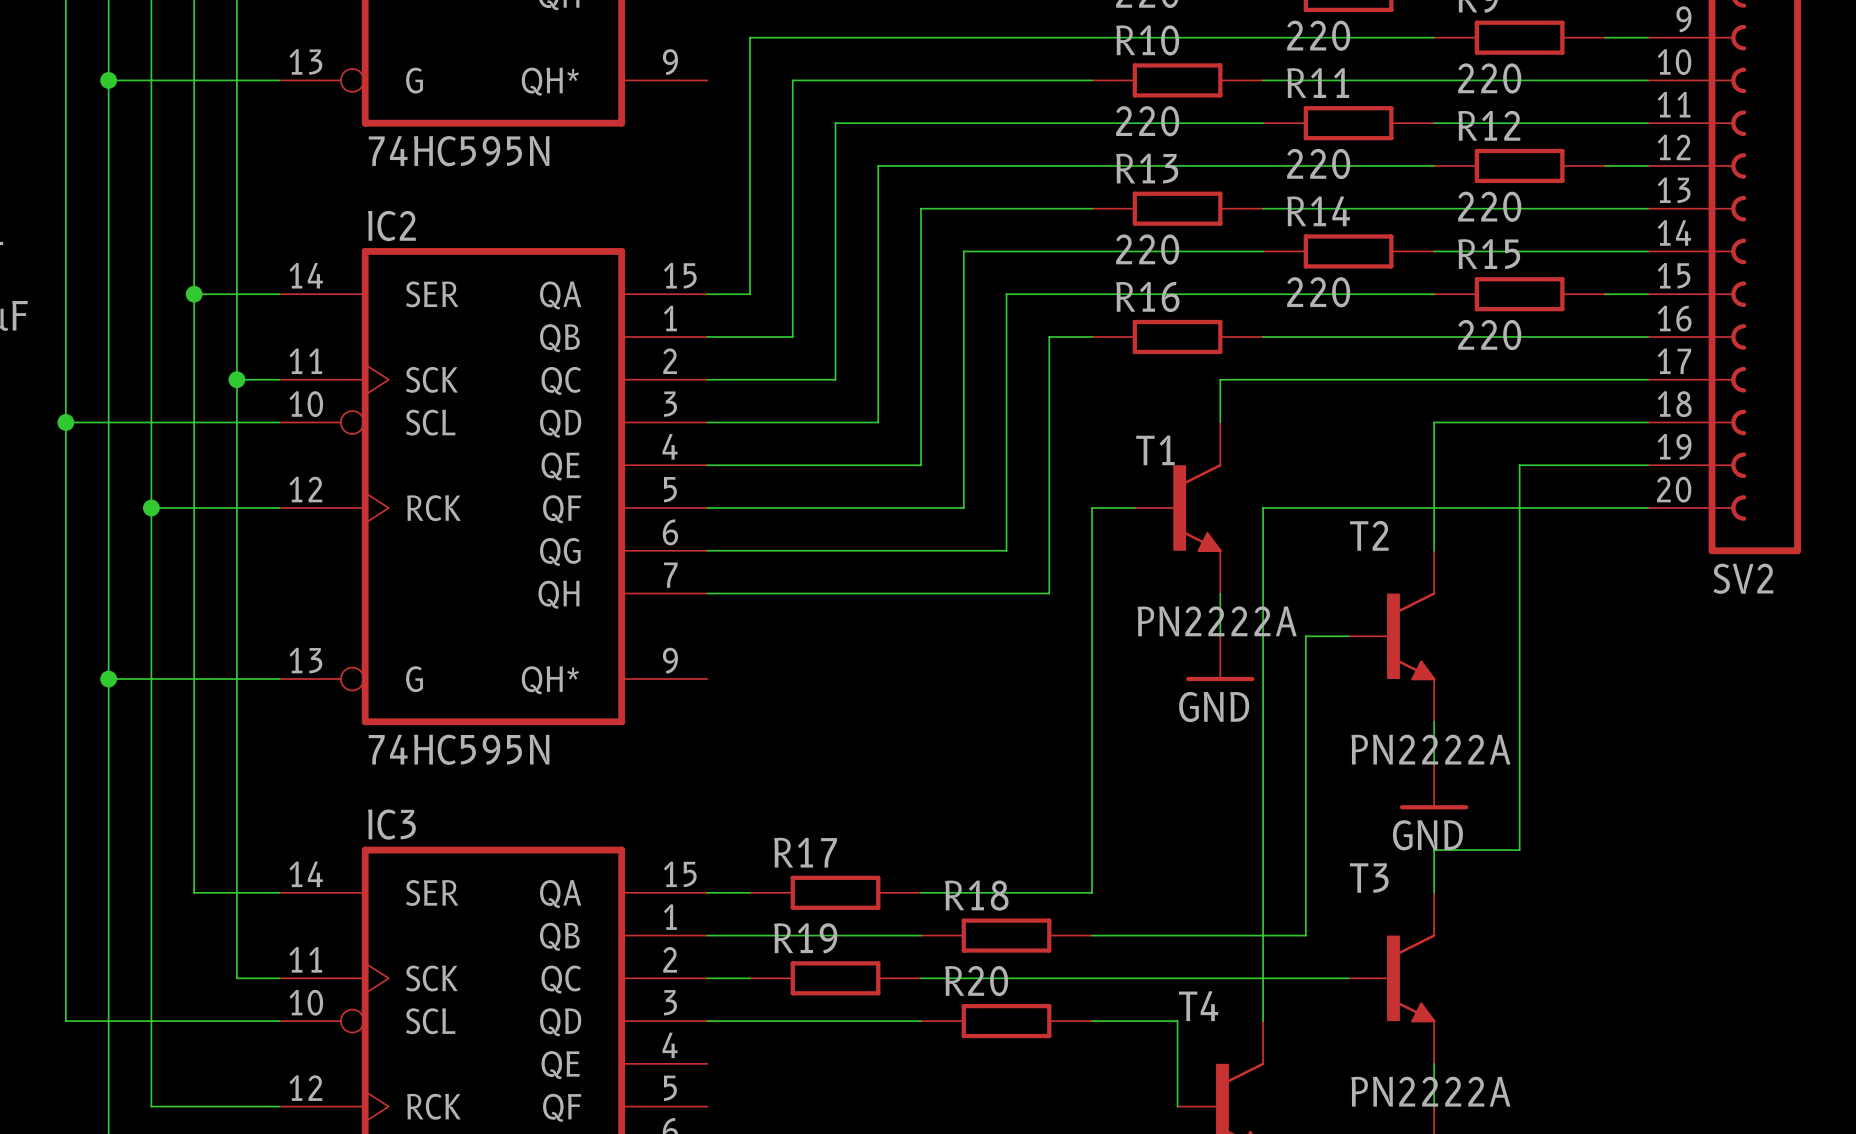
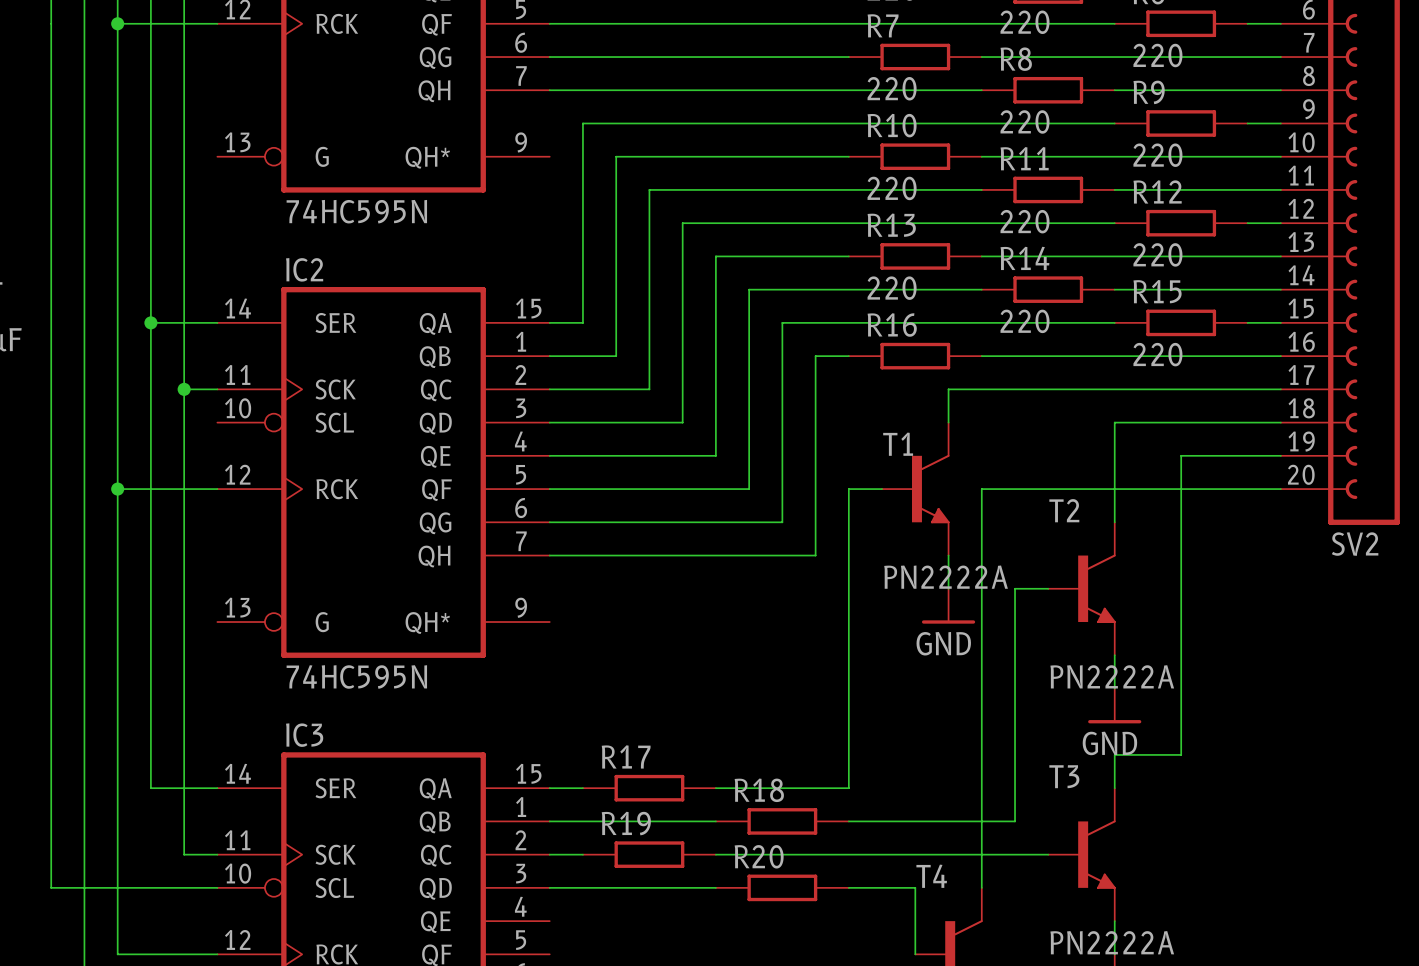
wire: (108, 80) (279, 80) -> none
junction: (108, 80) -> none
wire: (65, 422) (279, 422) -> none
junction: (65, 422) -> none
wire: (108, 679) (279, 679) -> none
junction: (108, 679) -> none

